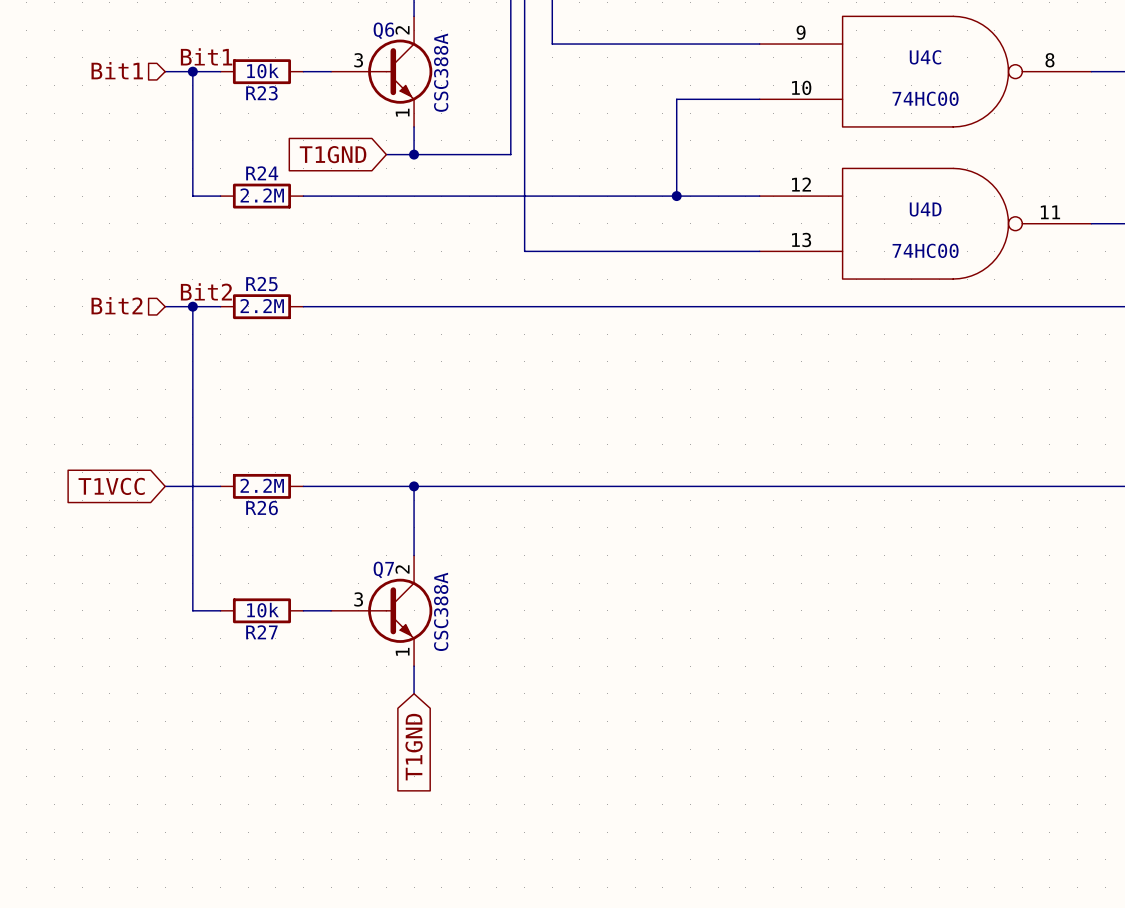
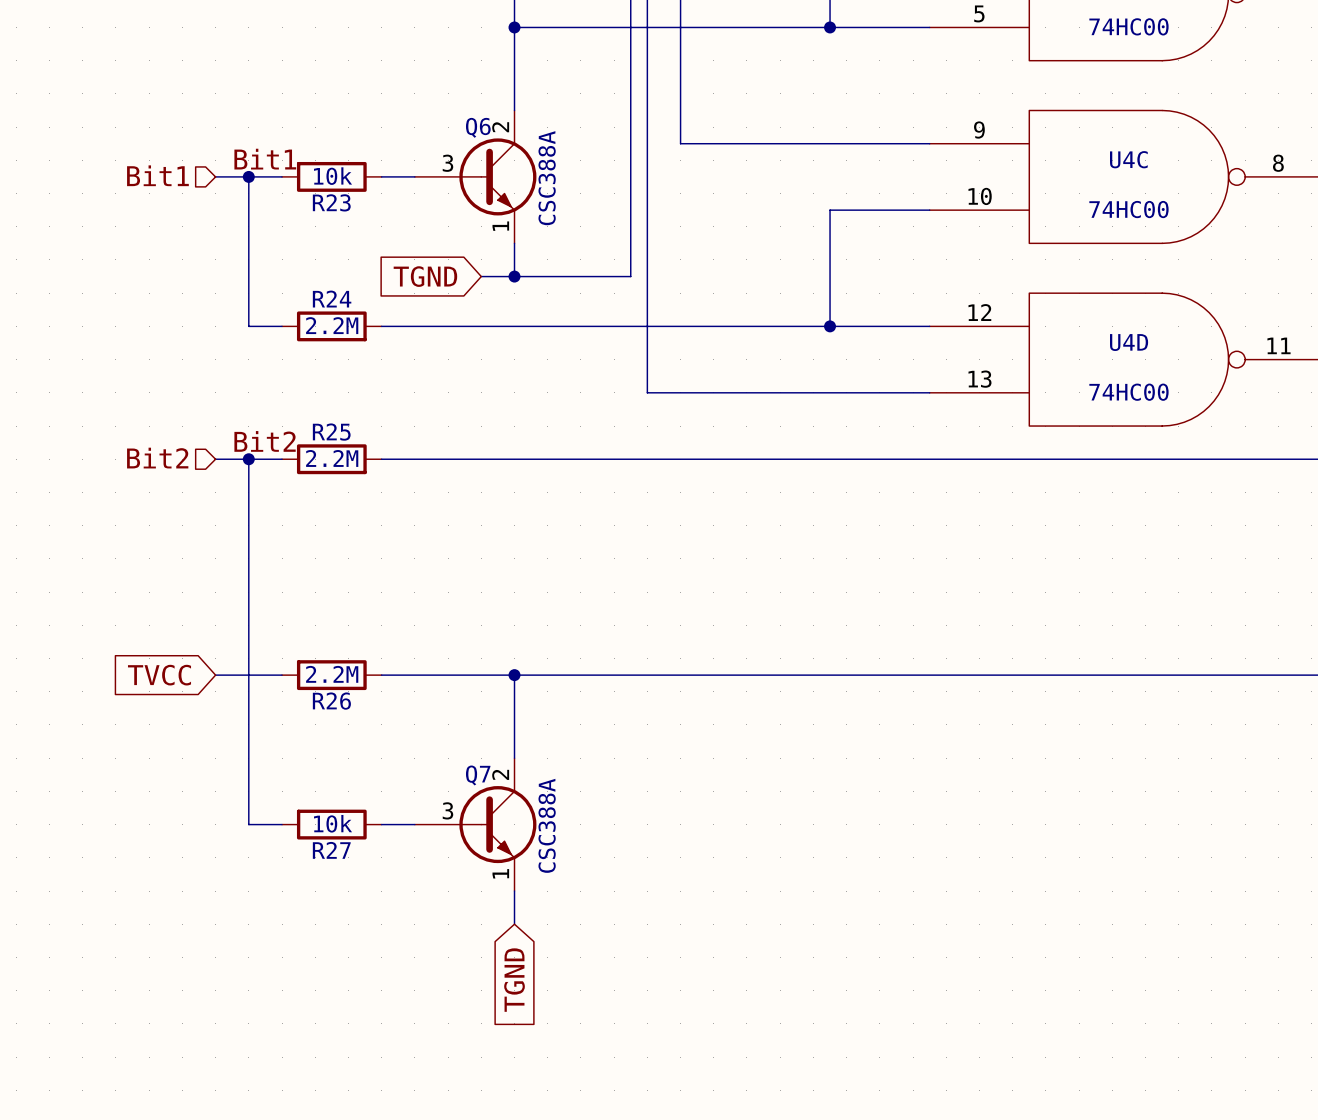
global label: T1GND (333, 154) -> TGND (425, 276)
global label: T1VCC (111, 486) -> TVCC (159, 675)
global label: T1GND (414, 747) -> TGND (514, 980)

